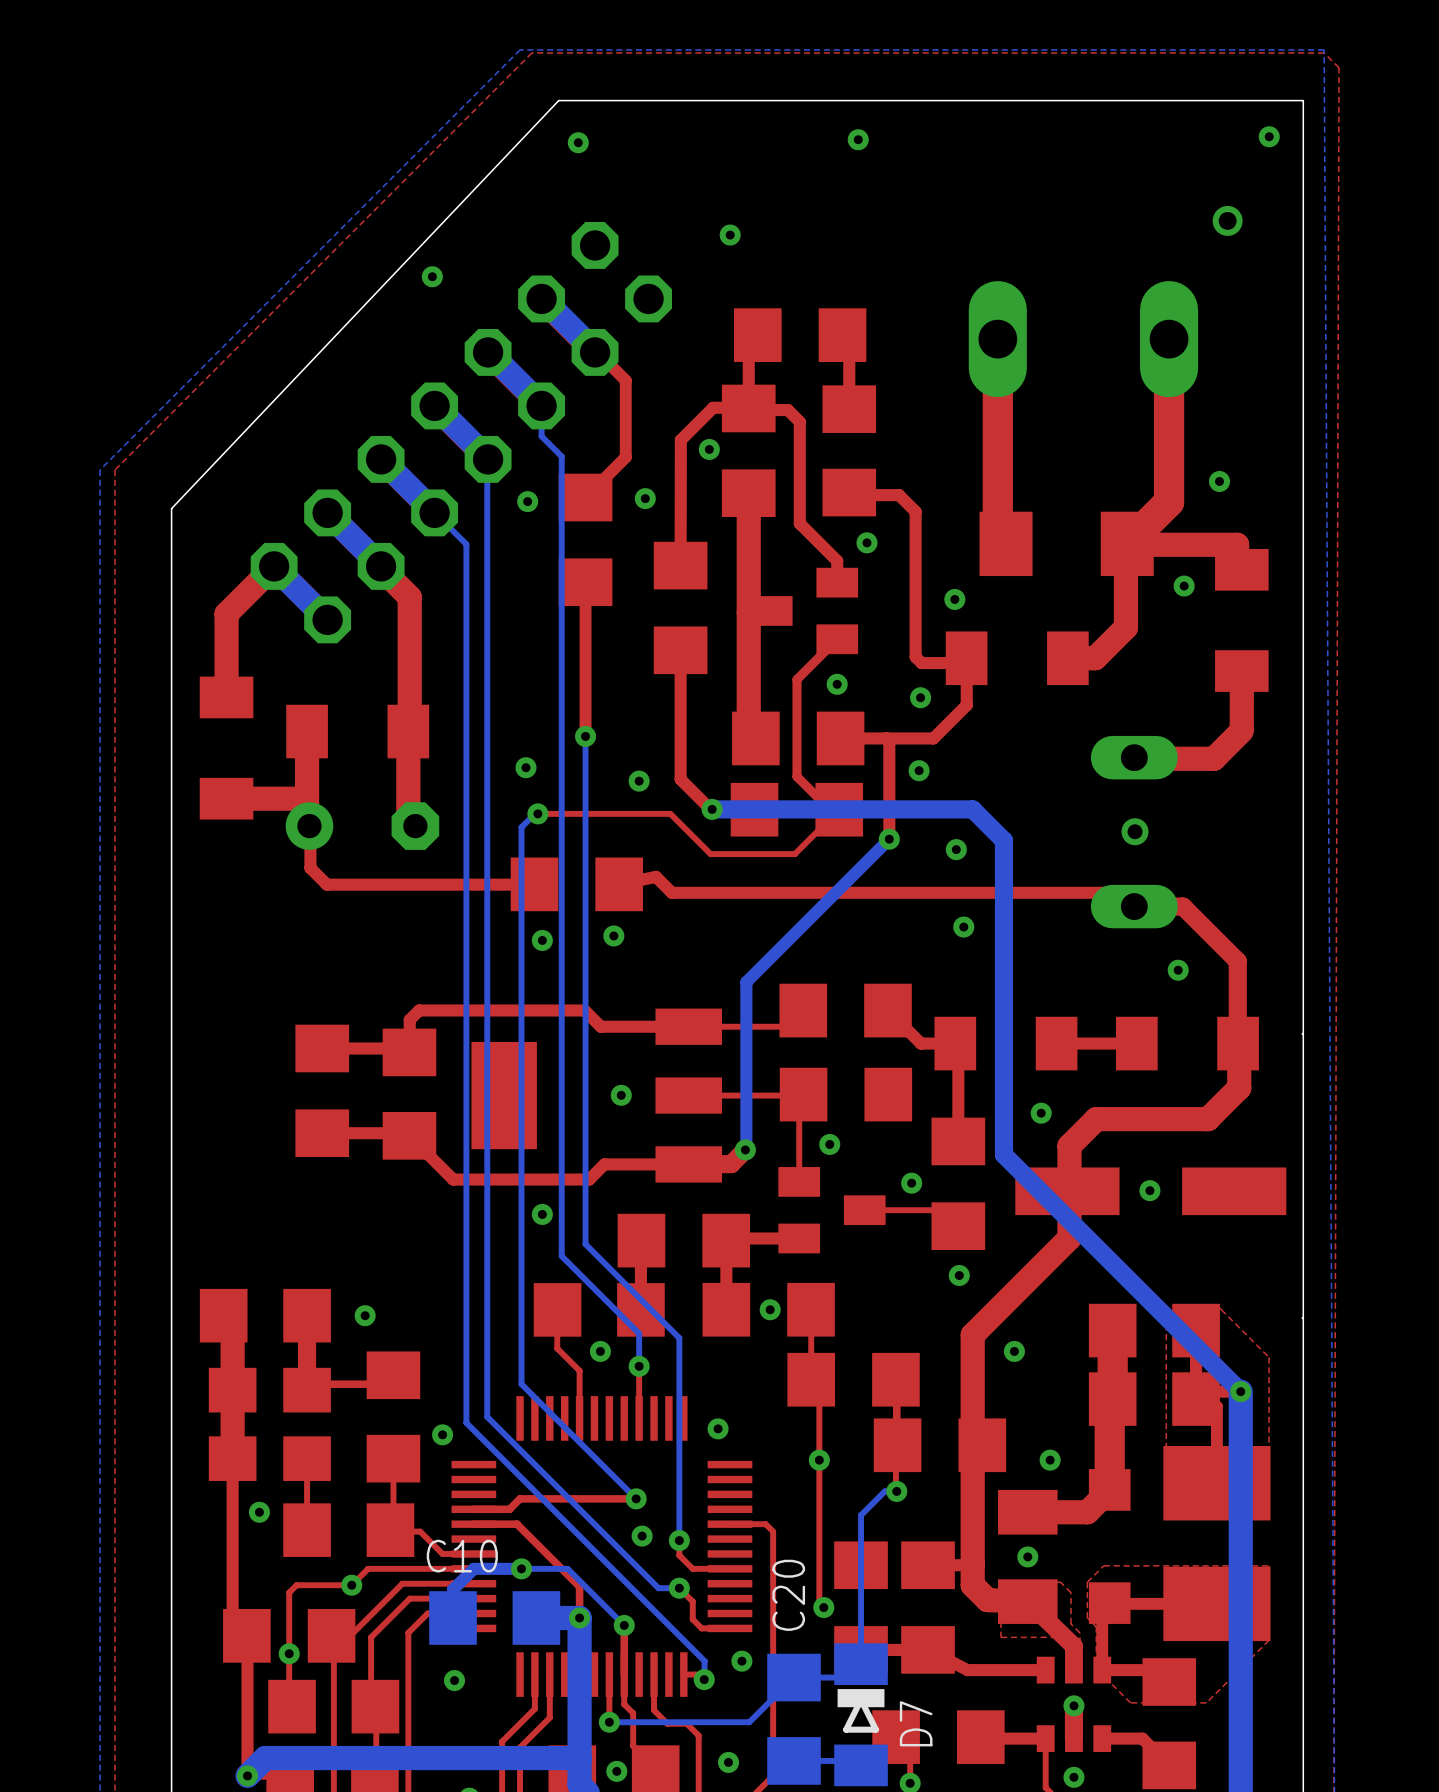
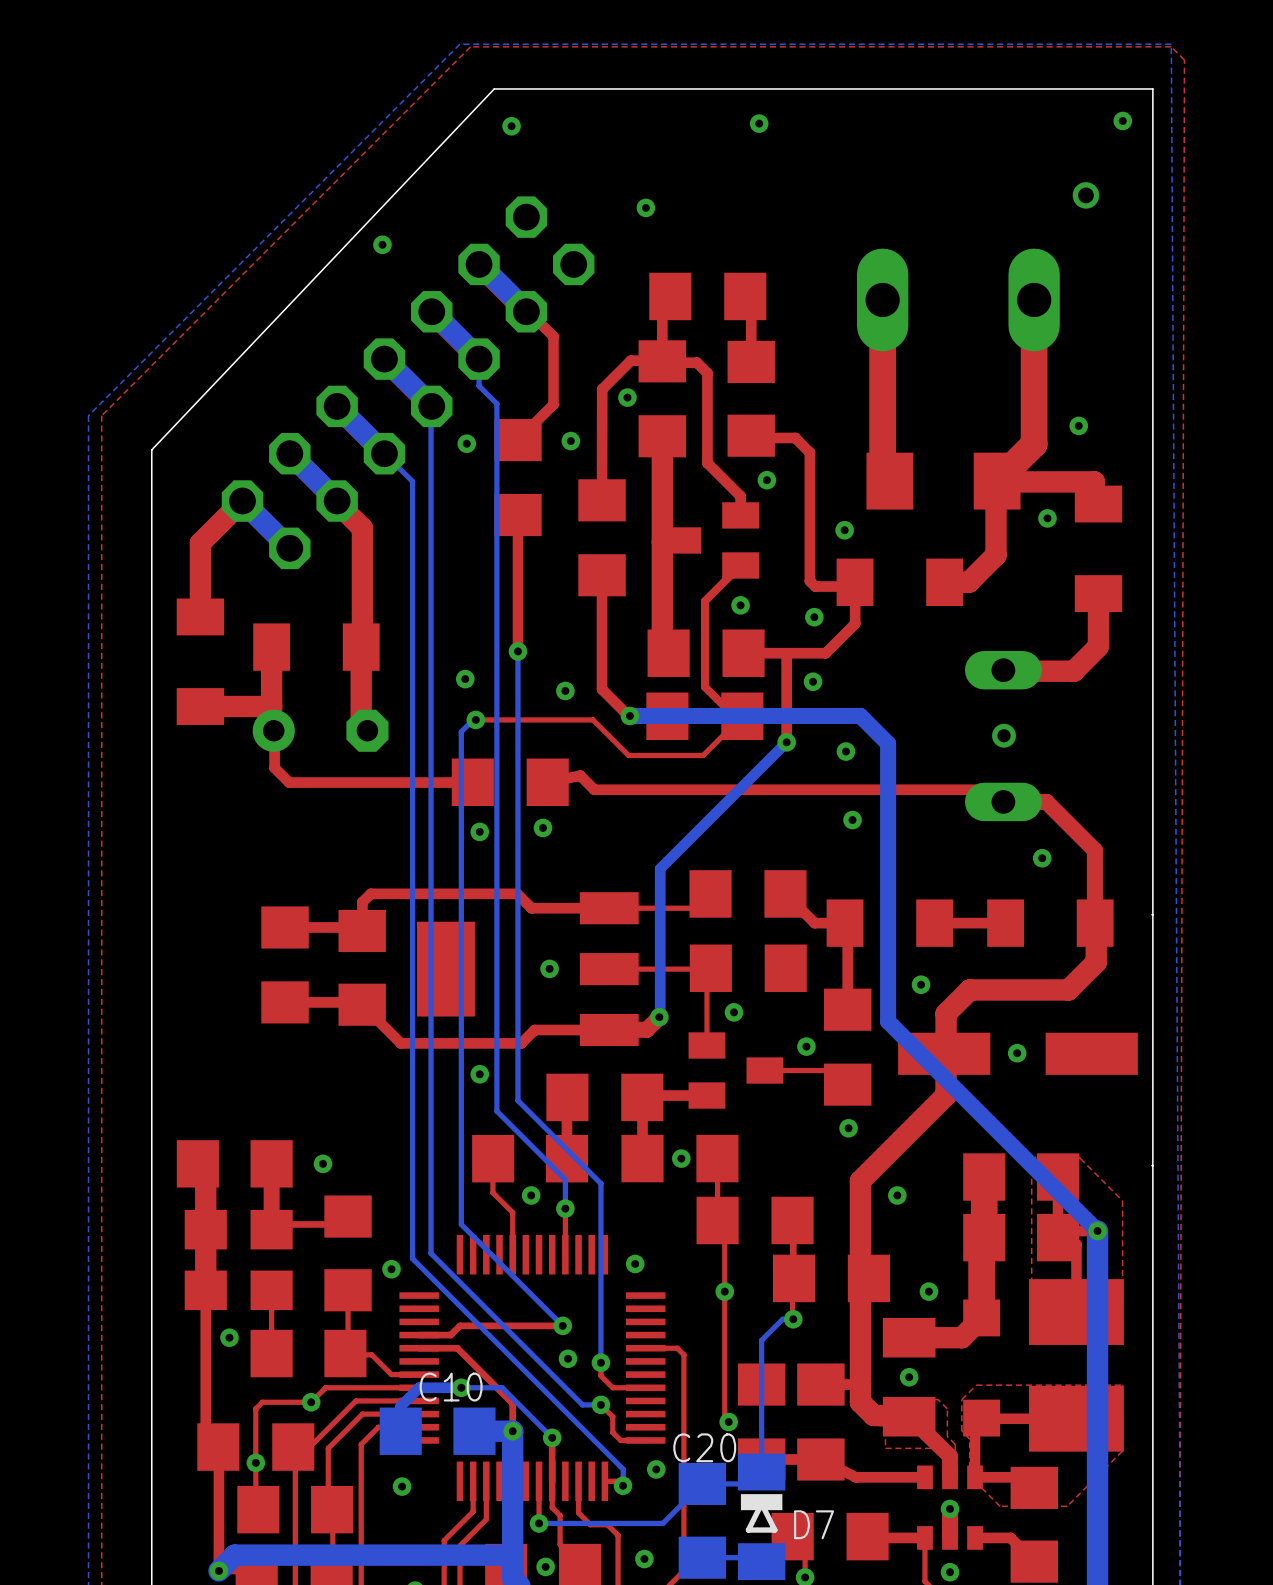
C10 name position: C10 (462, 1556) -> C10 (451, 1387)
C20 name rotation: 0° (788, 1595) -> 90° clockwise (704, 1447)
D7 name rotation: 0° (916, 1723) -> 90° clockwise (814, 1524)

